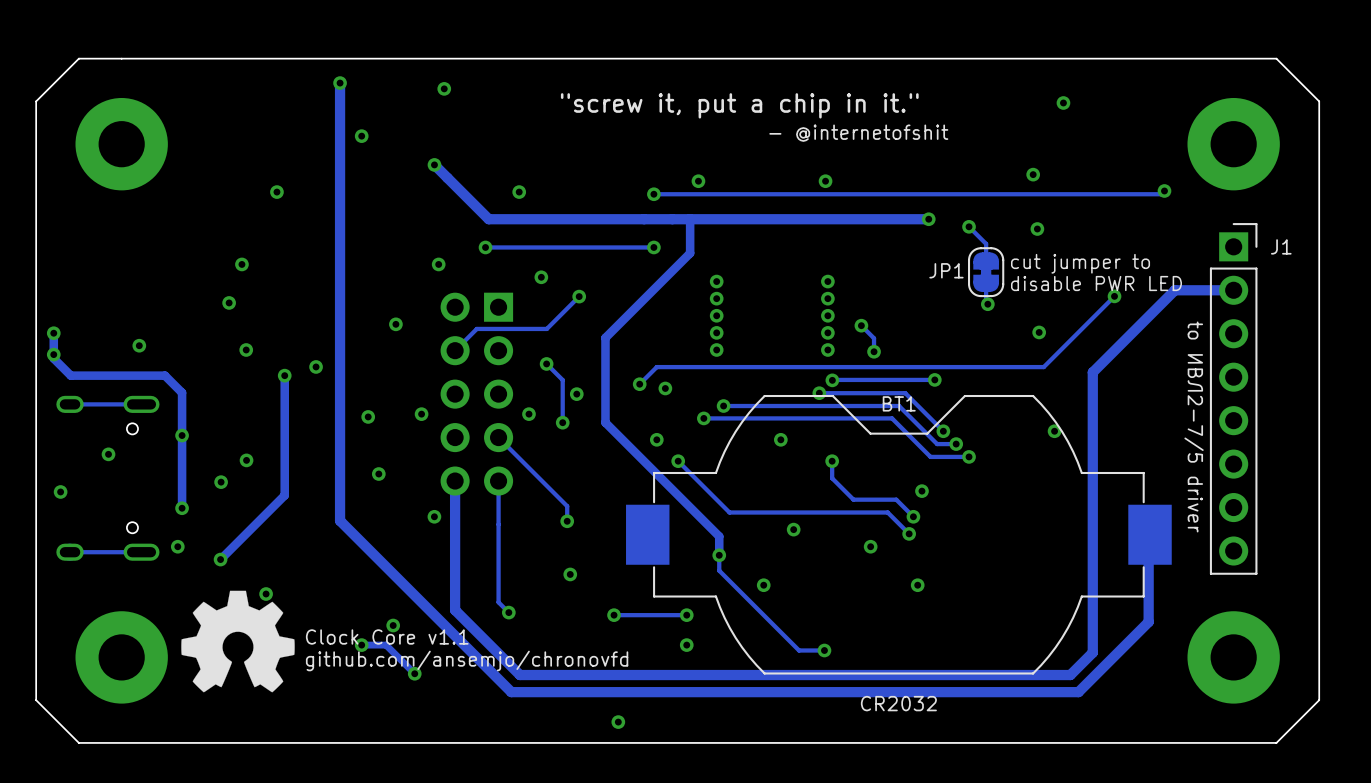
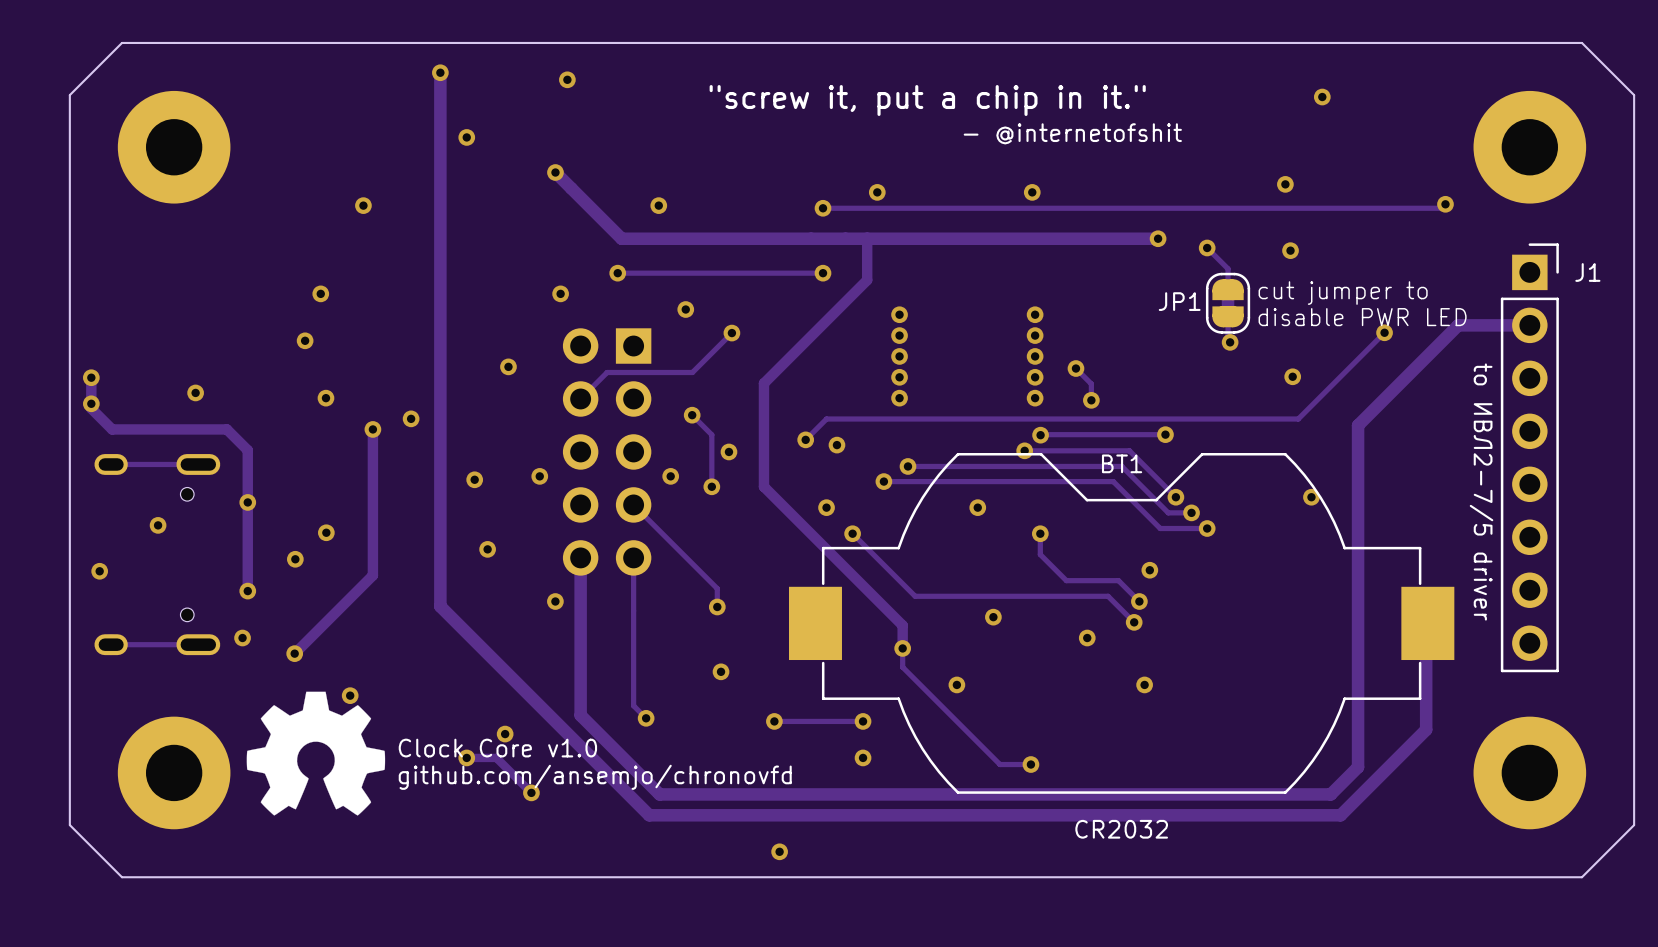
text: Clock Core v1.1 (387, 636) -> Clock Core v1.0 (497, 748)

